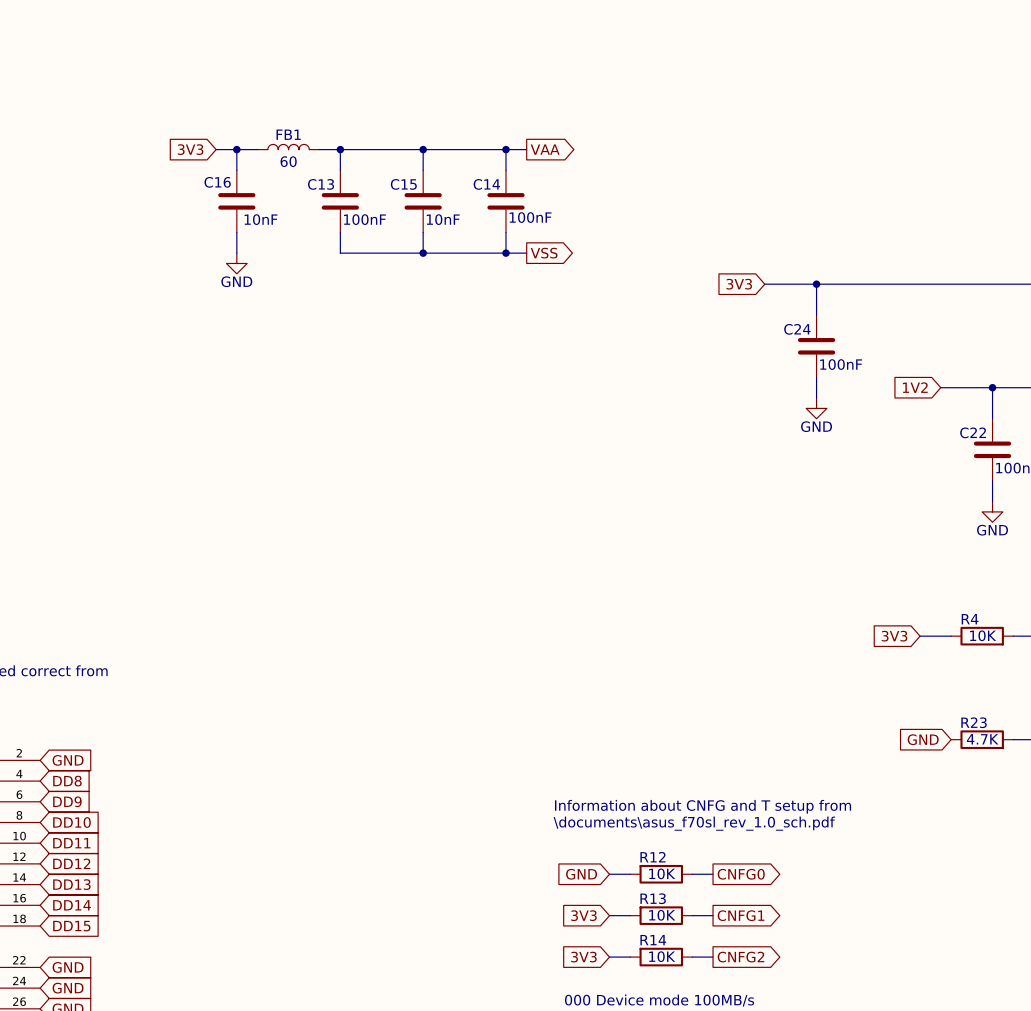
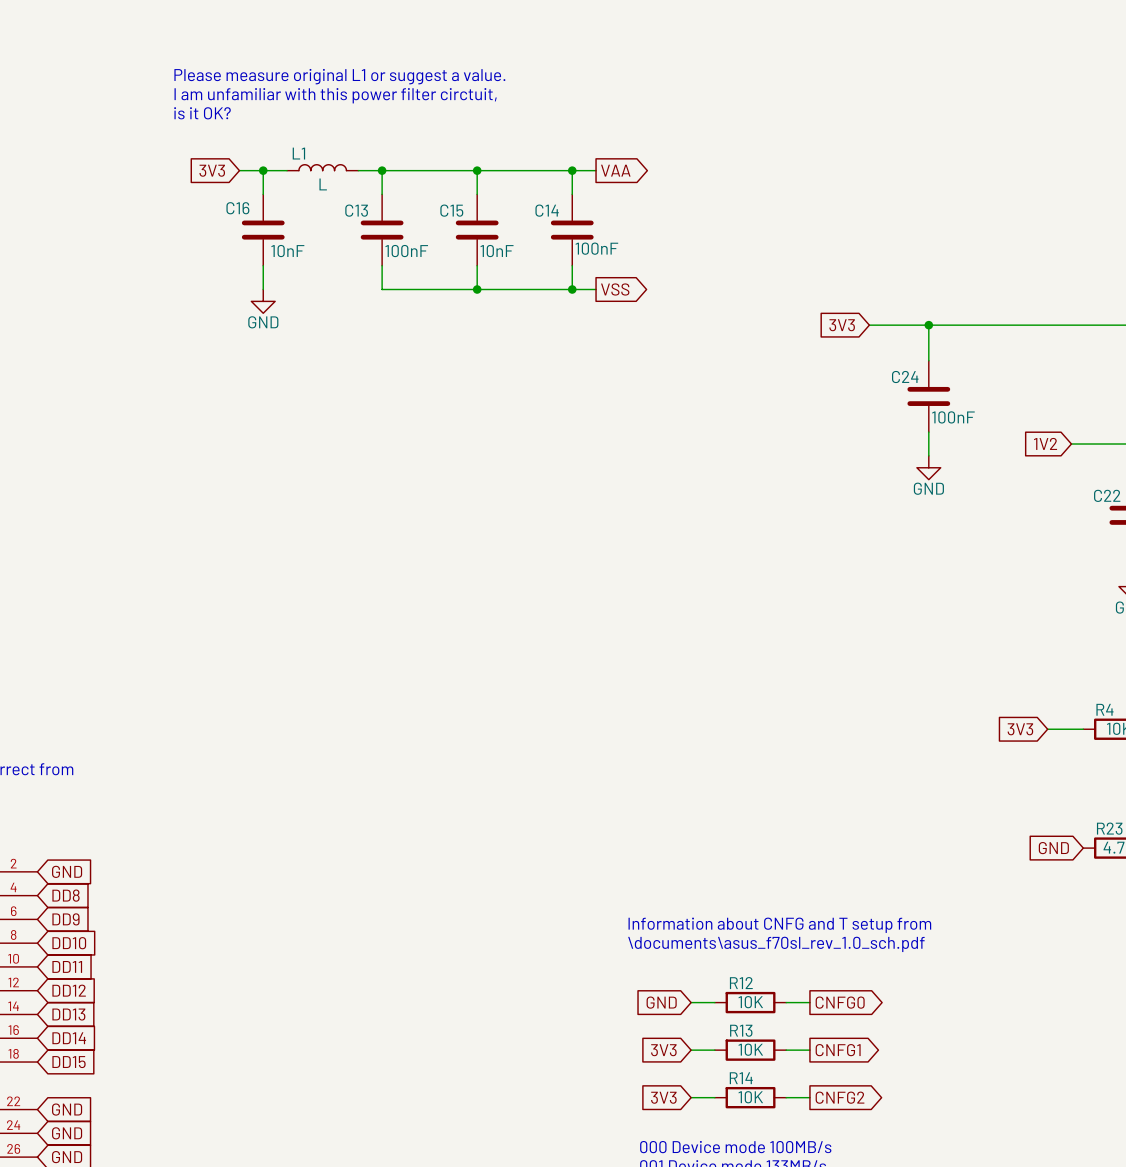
text: none -> Please measure original L1 or suggest a value. (339, 76)
text: none -> I am unfamiliar with this power filter circtuit, (335, 95)
text: none -> is it OK? (202, 113)
FB1 name: FB1 (288, 134) -> L1 (298, 153)
FB1 value: 60 (288, 161) -> L (323, 184)

